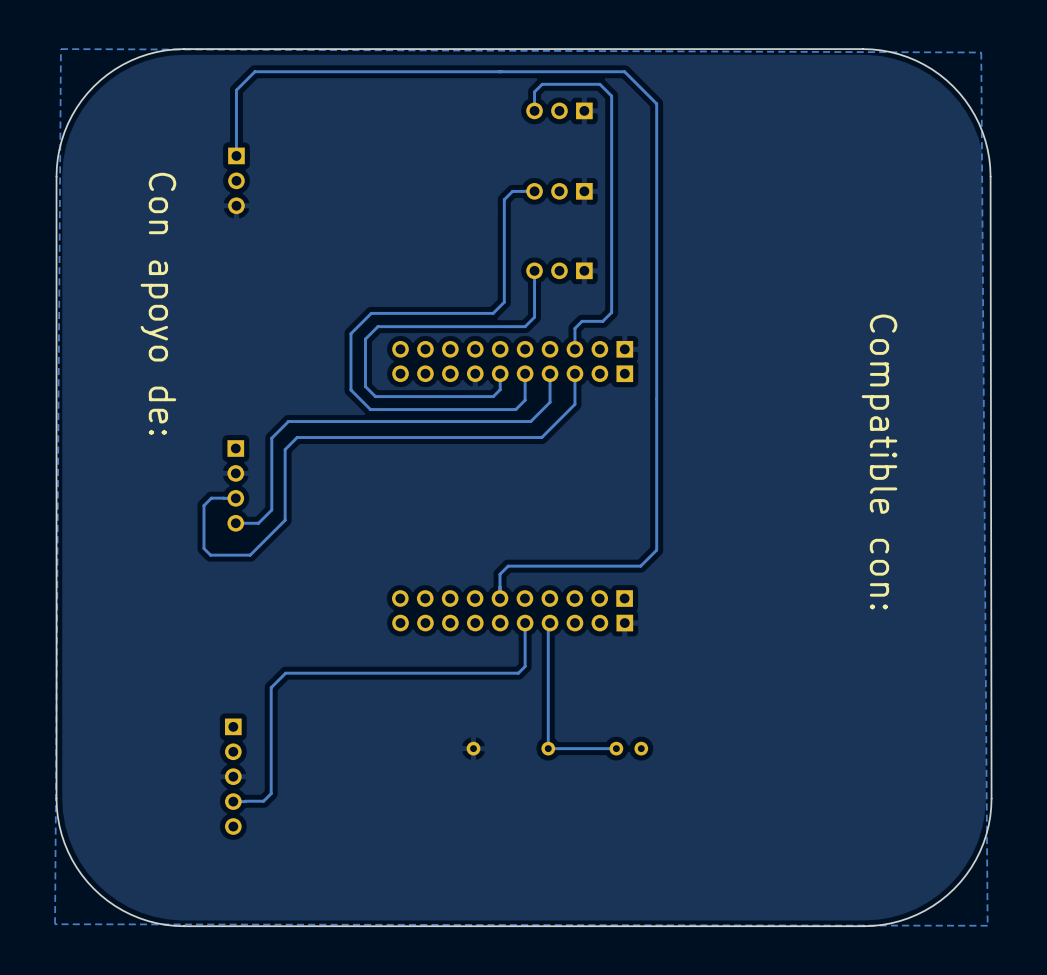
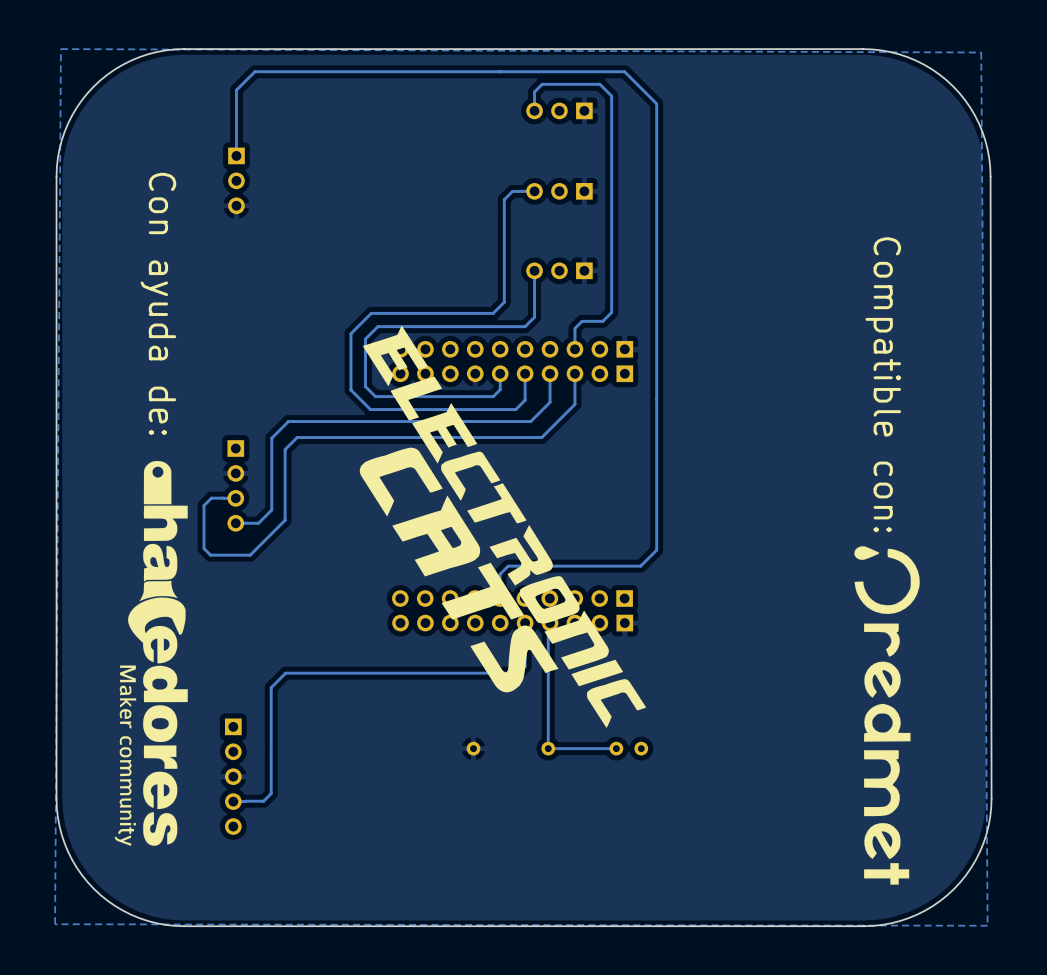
text: Con apoyo de: (158, 303) -> Con ayuda de: (158, 303)
drawing: none -> [359, 325, 647, 728]
drawing: none -> [114, 460, 188, 846]
text position: Compatible con: (879, 462) -> Compatible con: (883, 384)
drawing: none -> [854, 546, 920, 885]

